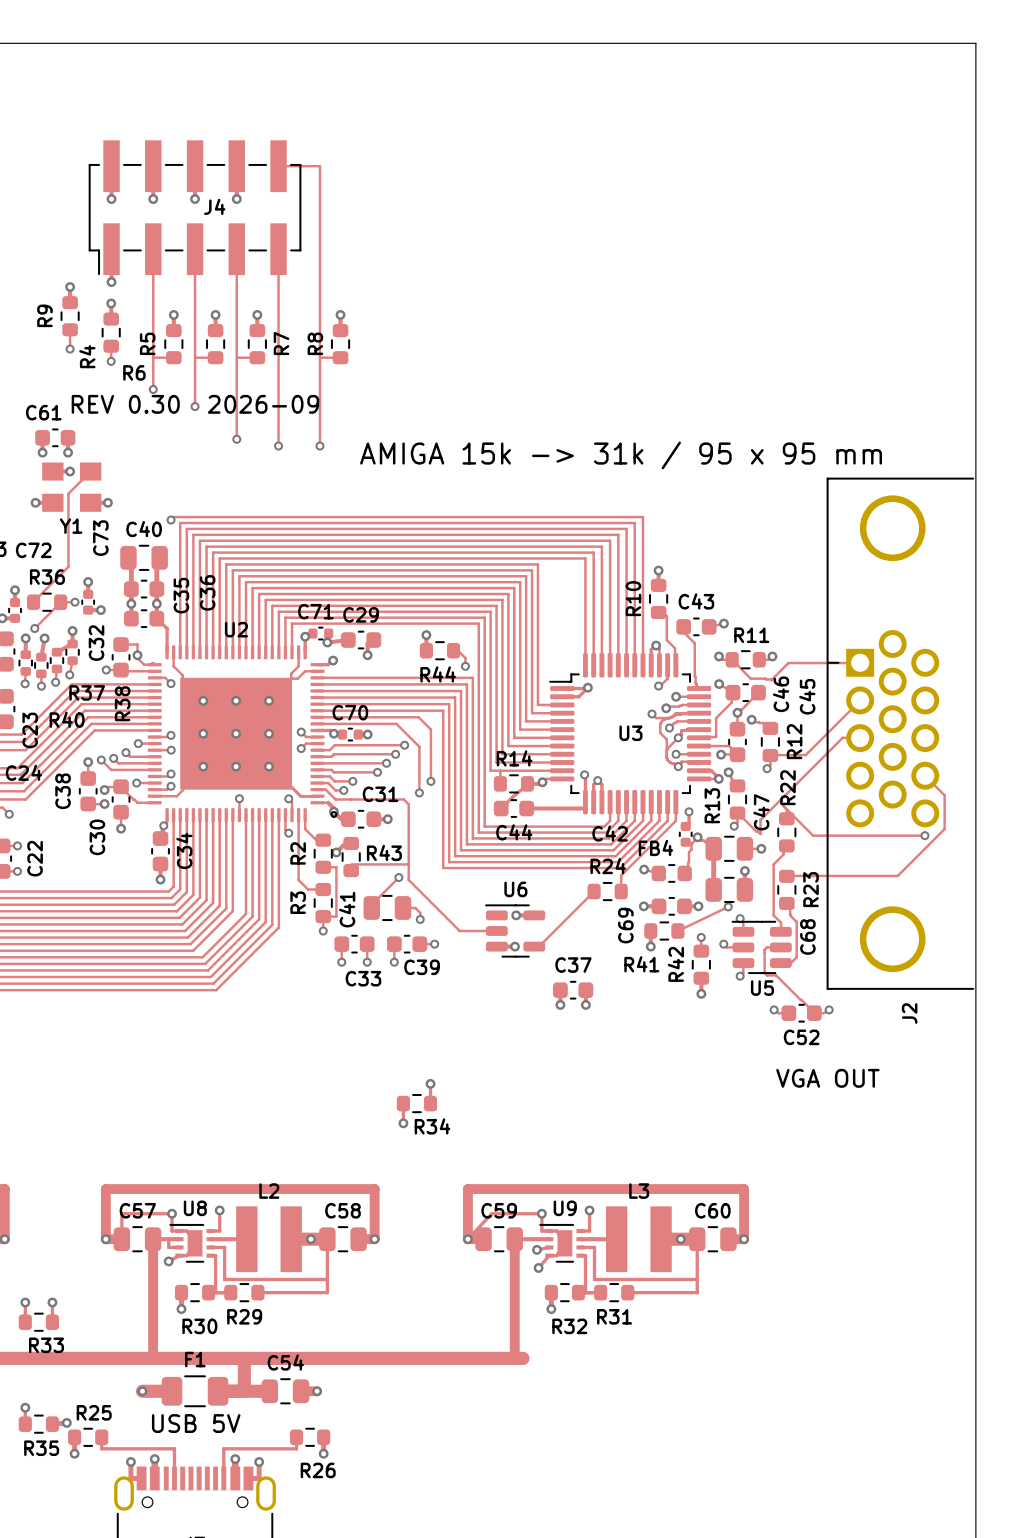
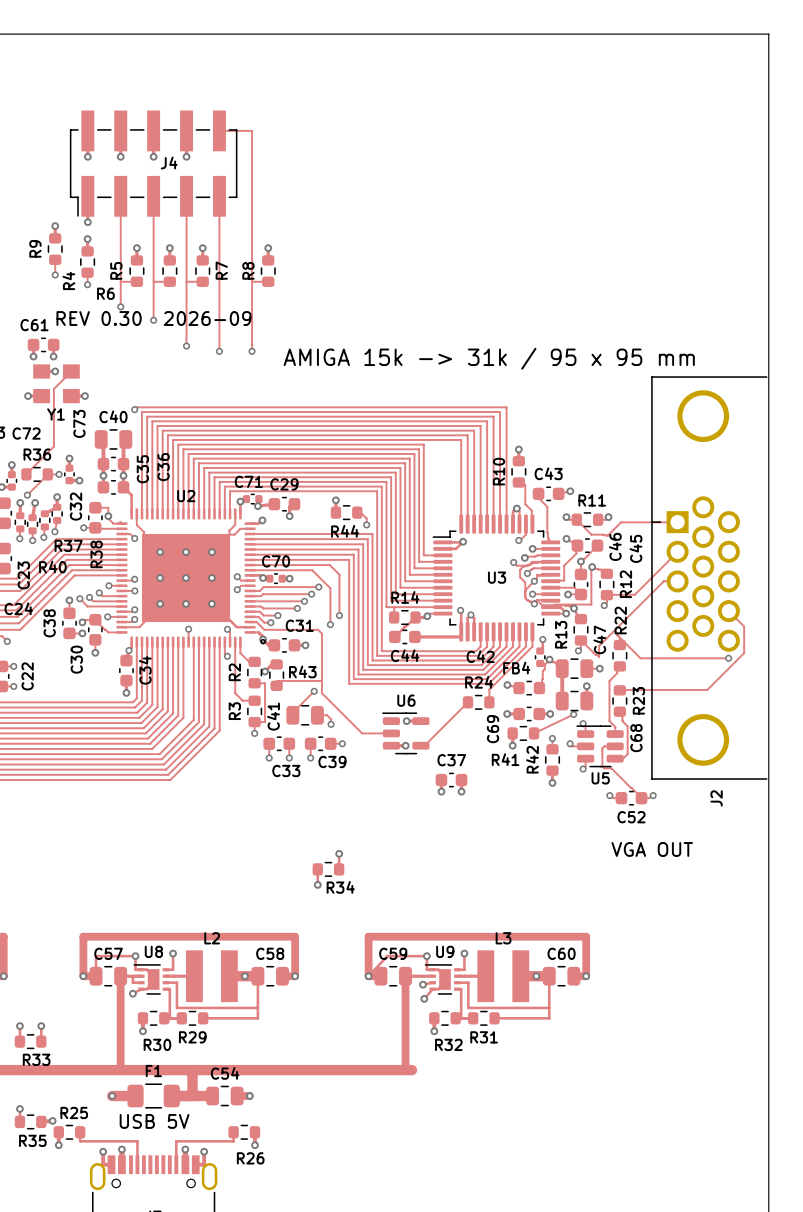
track: none -> (591, 567) (591, 604) (554, 604)
track: none -> (536, 600) (542, 605) (571, 606)

